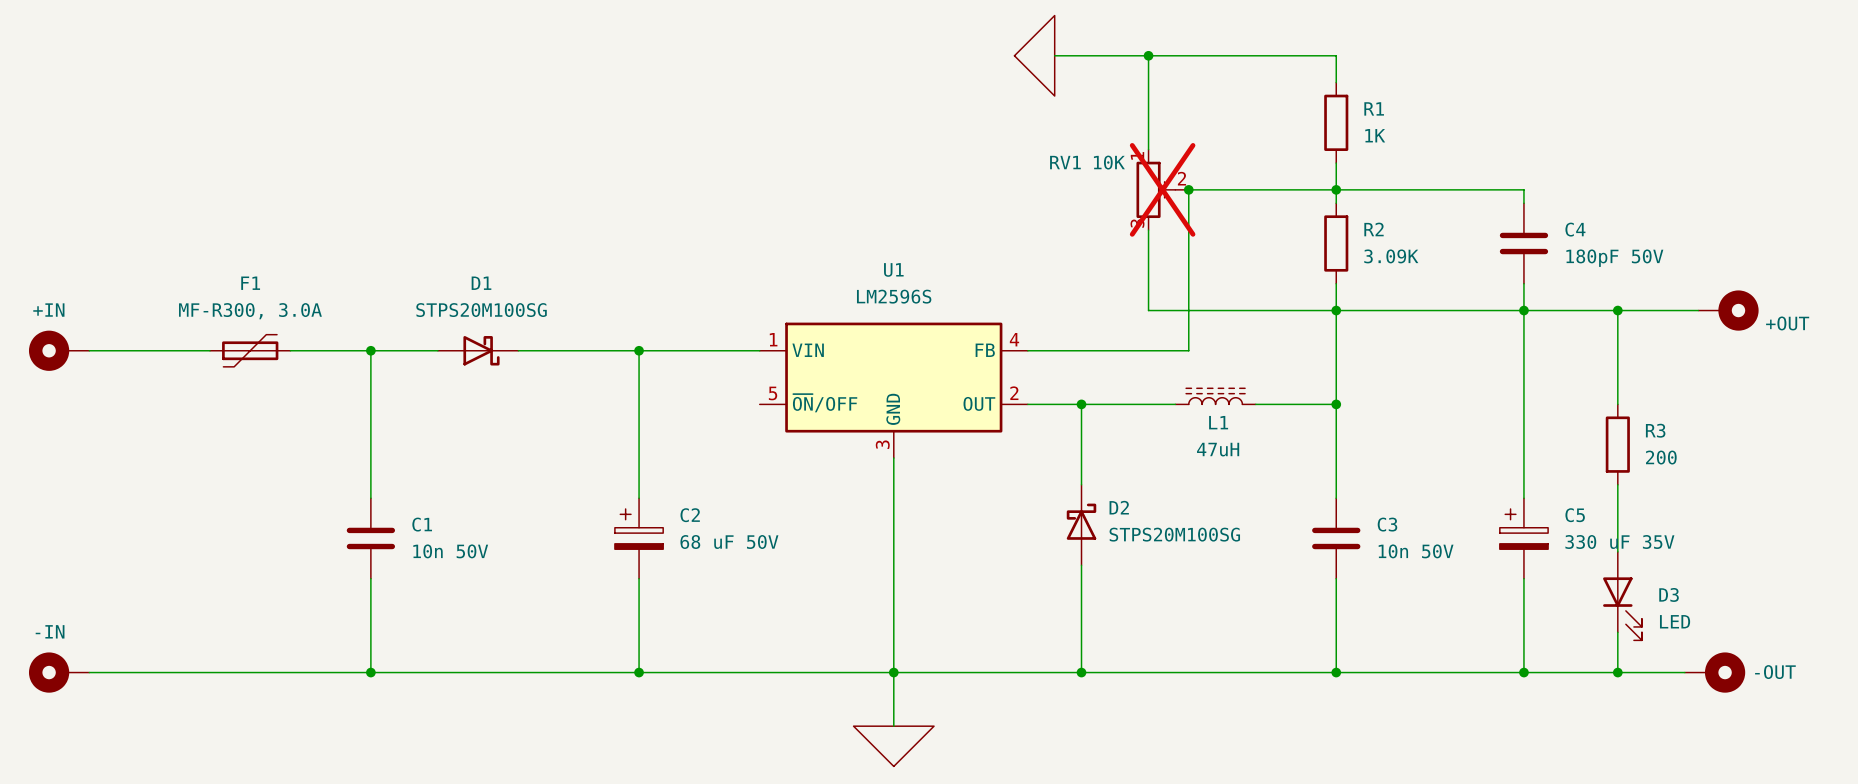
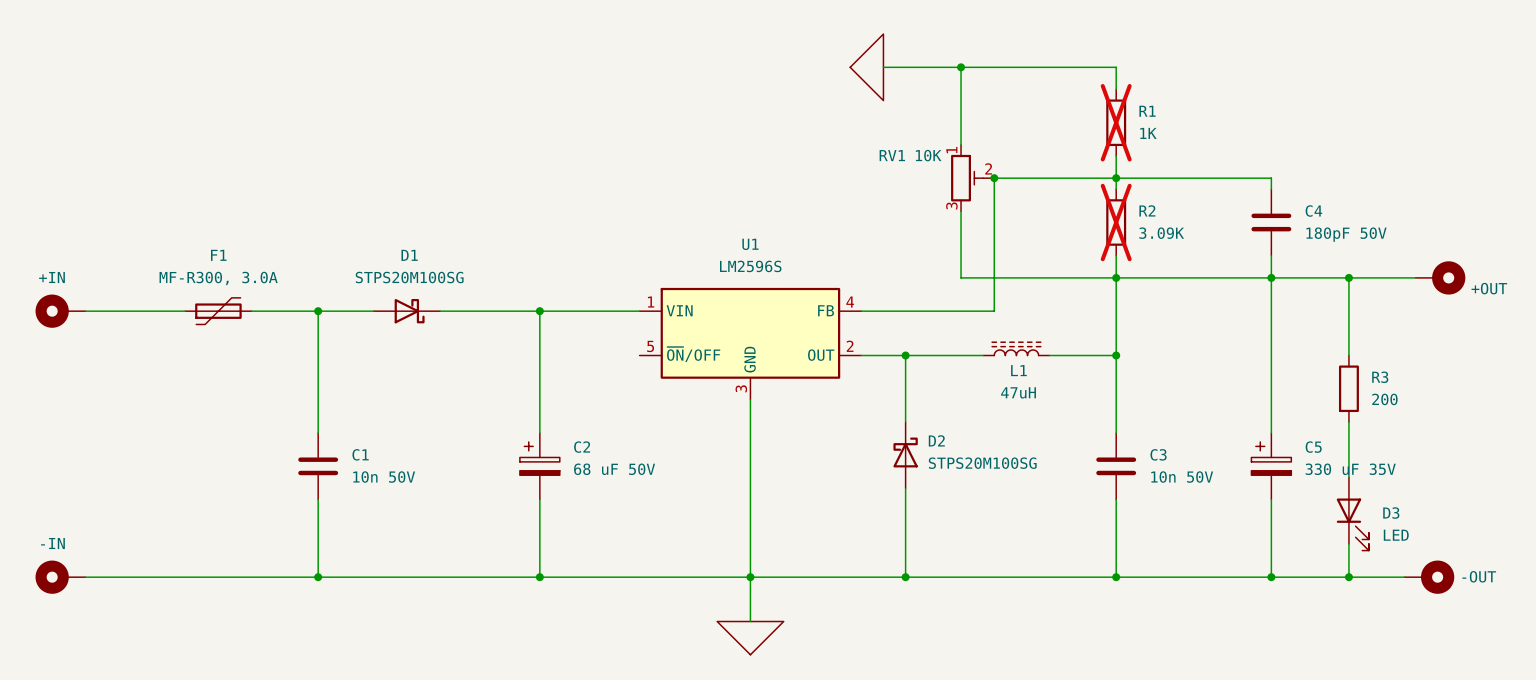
R1 do-not-place cross: none -> (1116, 122)
RV1 do-not-place cross: (1162, 189) -> none
R2 do-not-place cross: none -> (1116, 222)

